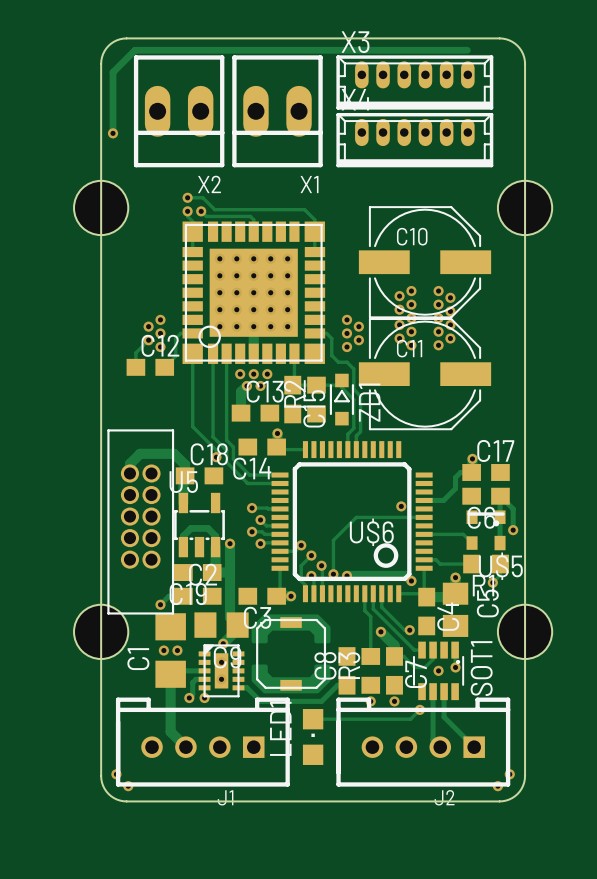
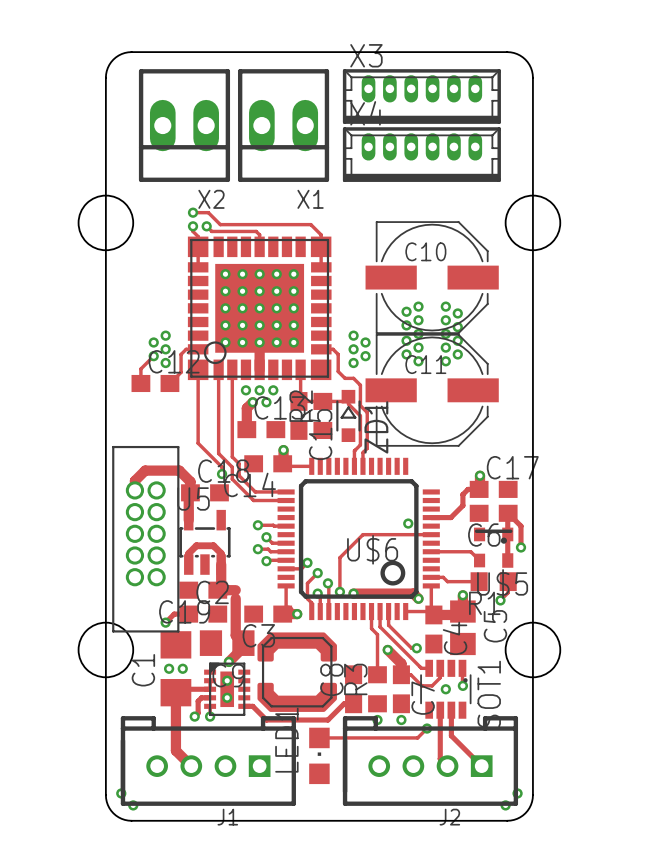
track: (467, 50) (135, 50) (113, 72) (113, 133) -> none
via: (113, 133) -> none
track: (230, 543) (230, 581) -> none
via: (230, 543) -> none

